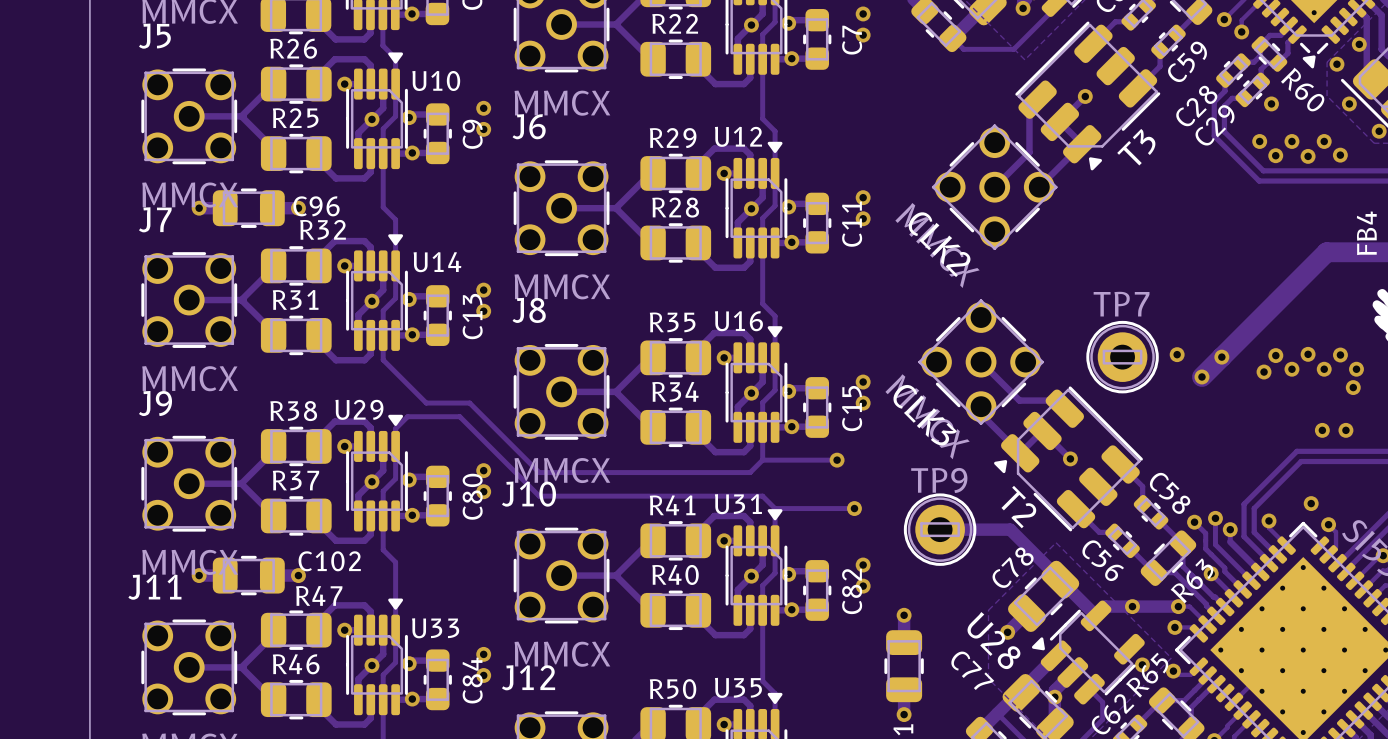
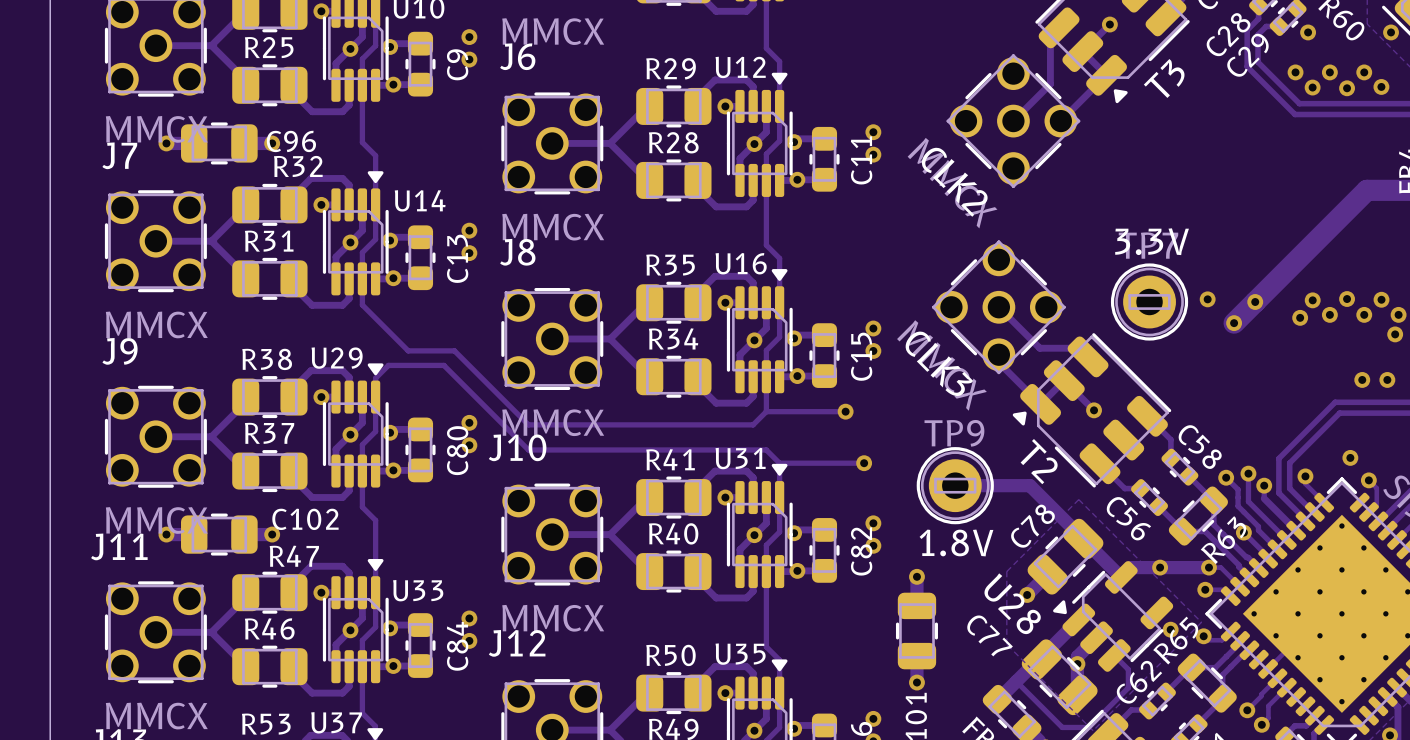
text: none -> 3.3V (1152, 241)
text: none -> 1.8V (956, 542)

